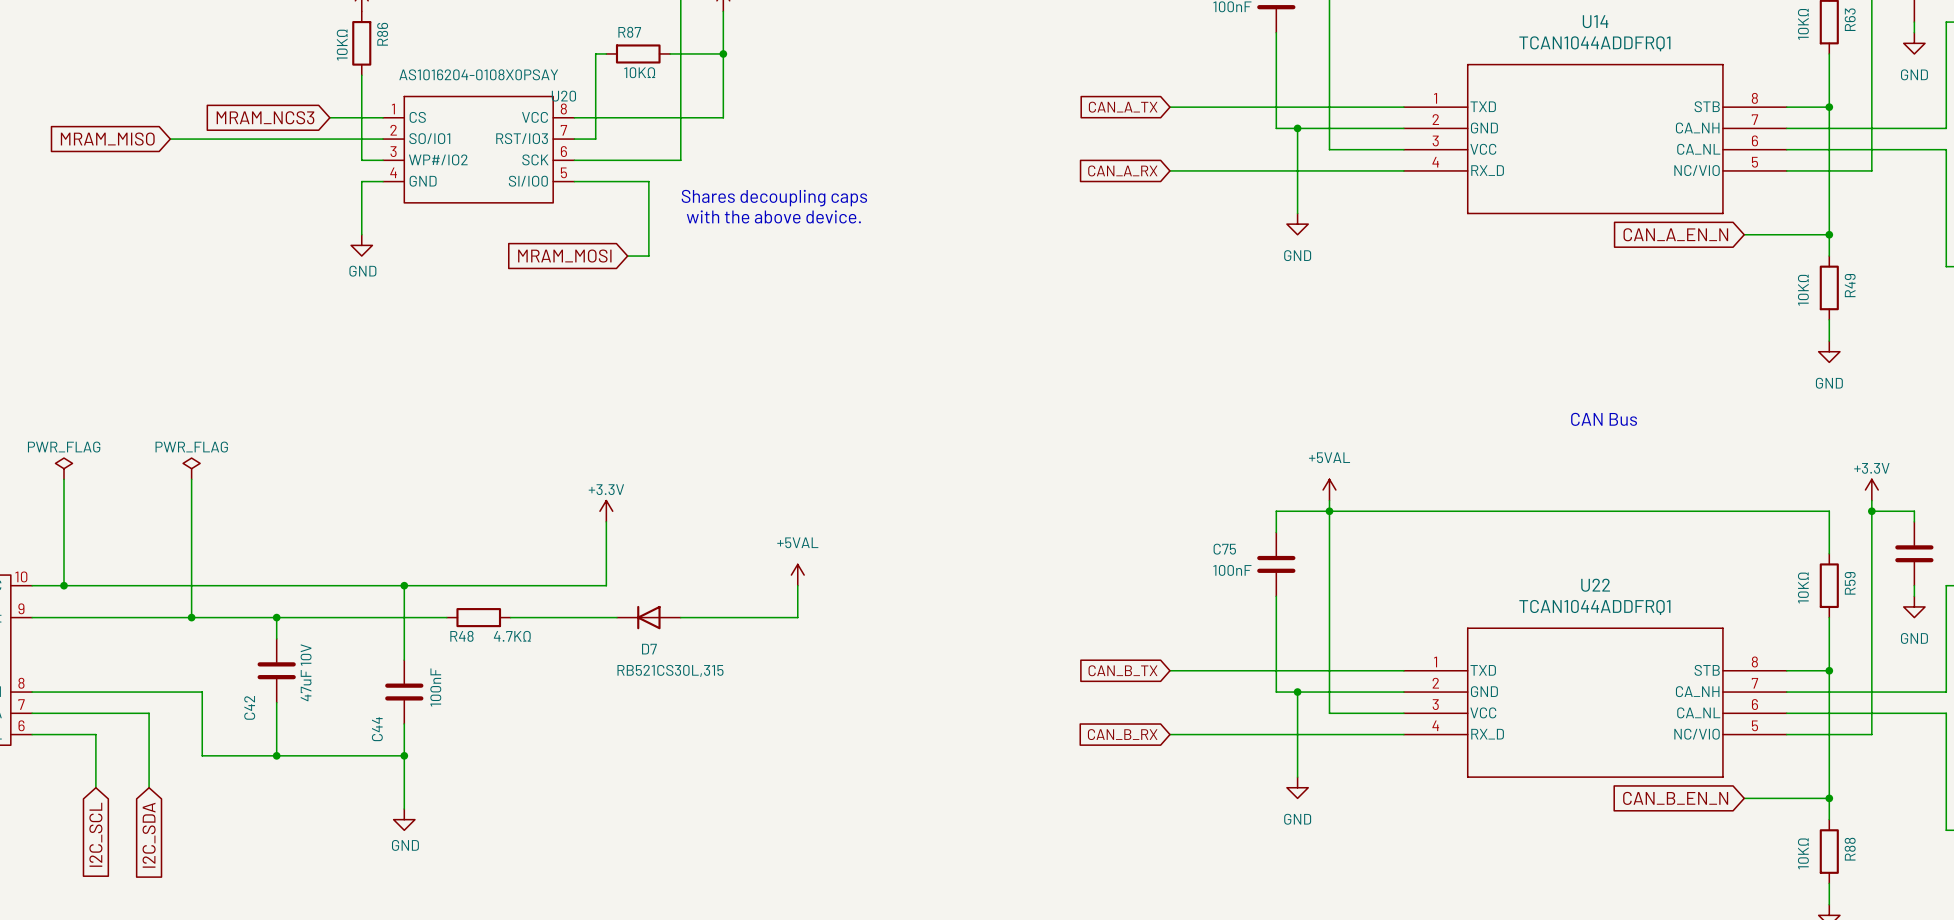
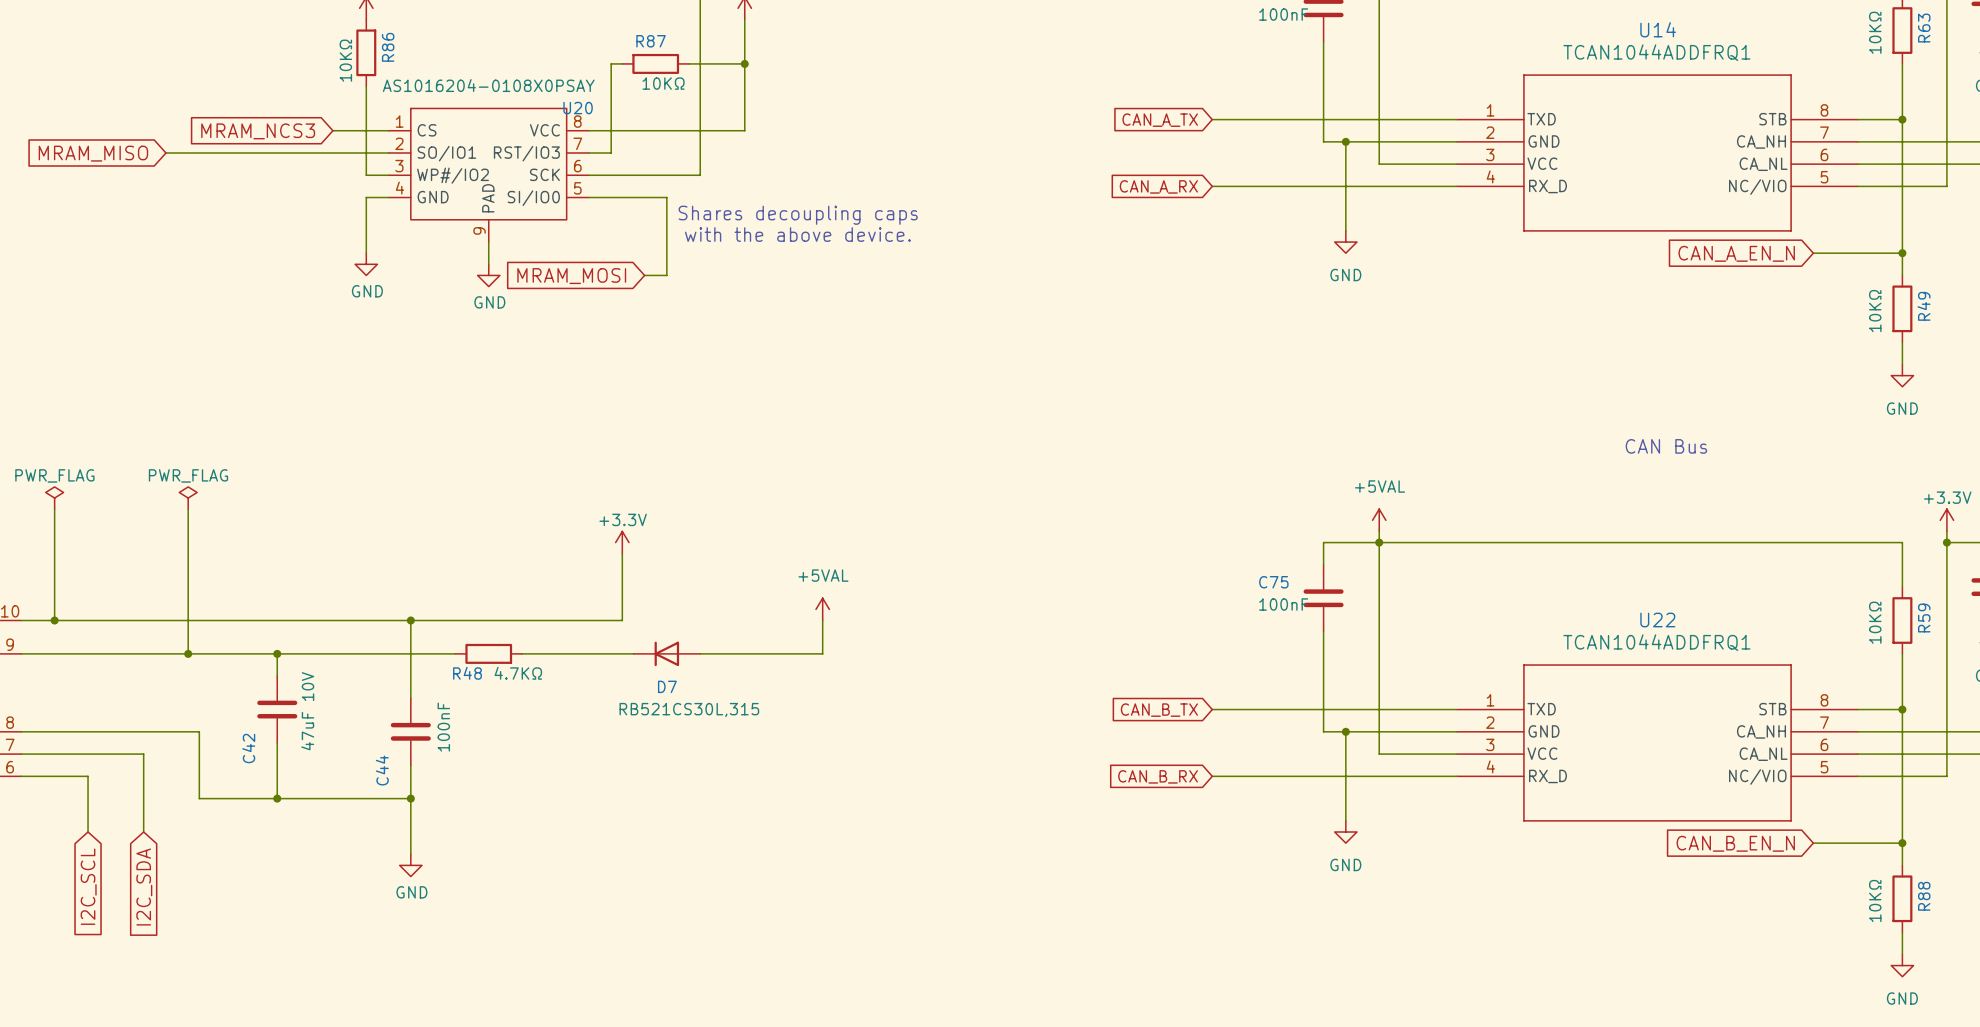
U20 symbol: [383, 96, 575, 203] -> [388, 108, 589, 243]
wire: none -> (488, 242) (488, 264)
power symbol: none -> GND (488, 275)

